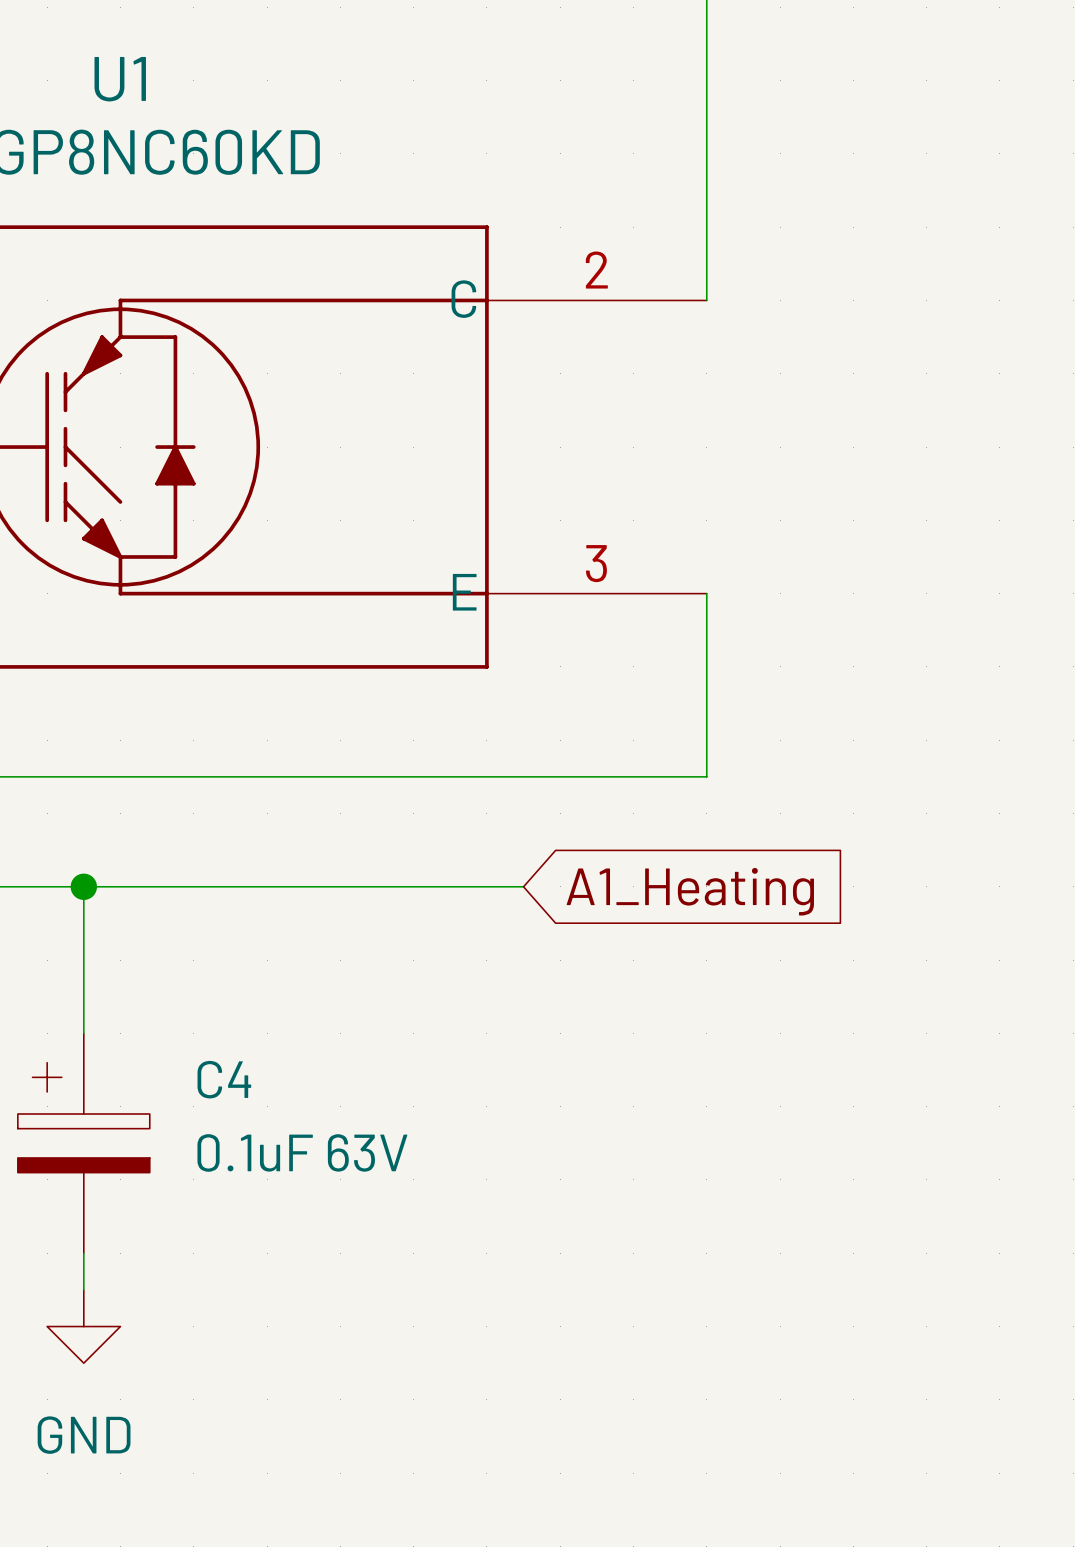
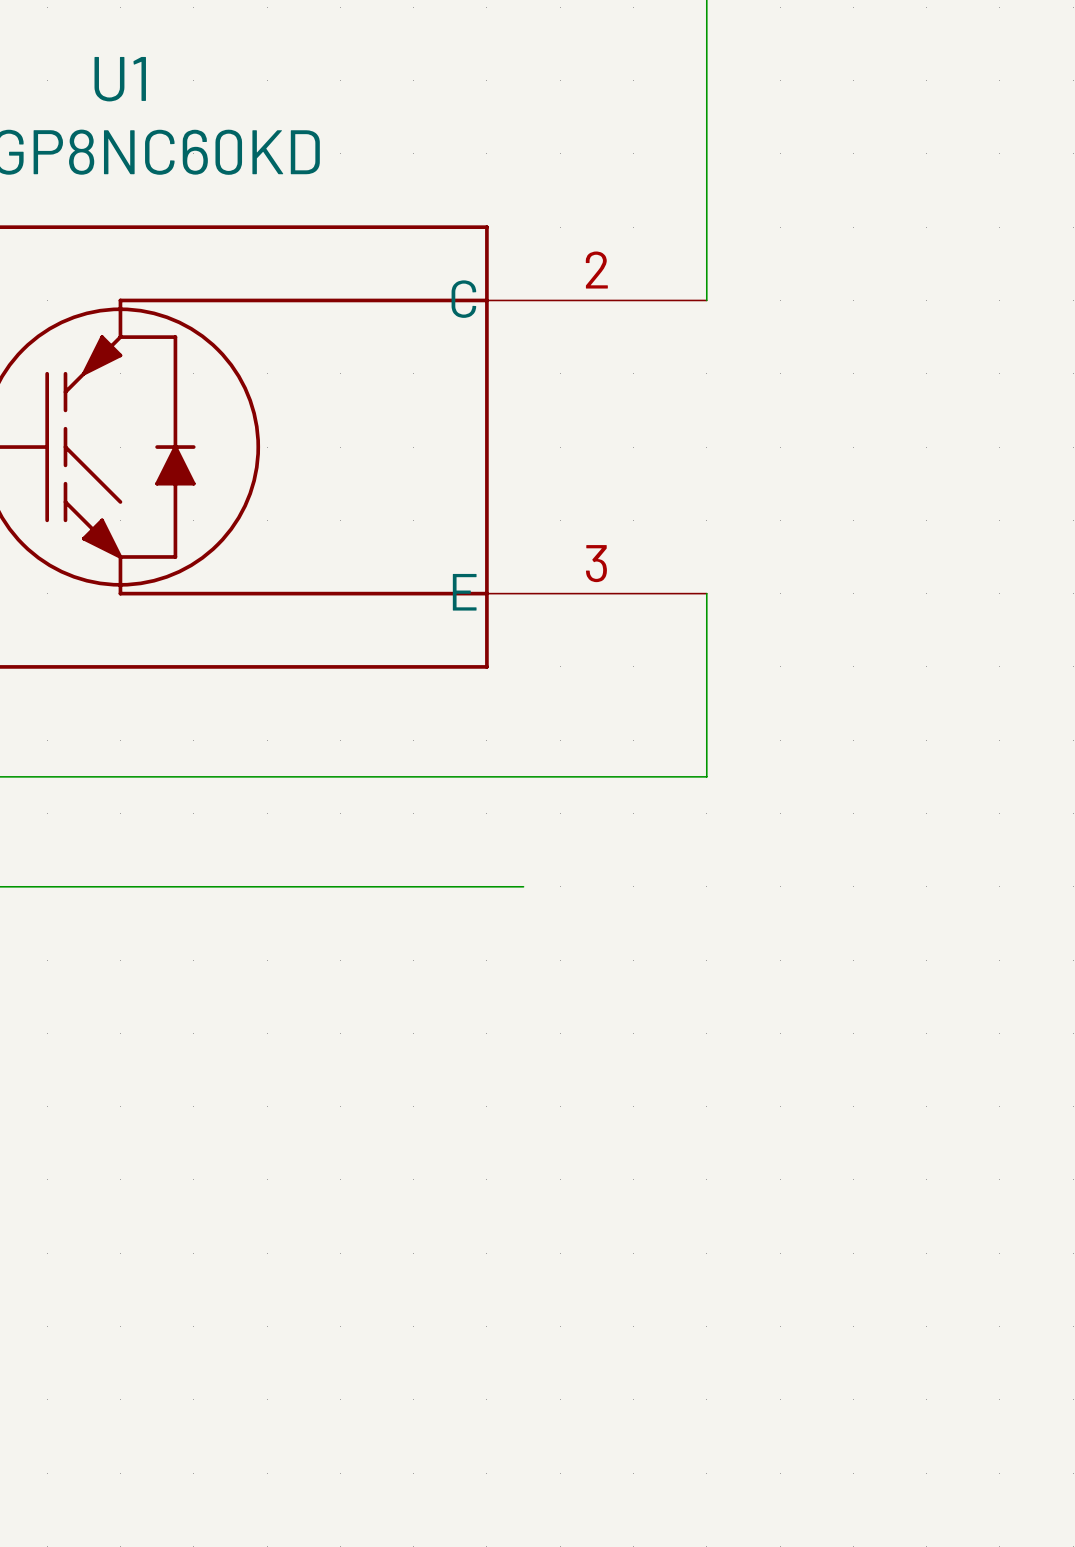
wire: (83, 886) (83, 1033) -> none
junction: (83, 886) -> none
global label: A1_Heating (690, 891) -> none
C4: 0.1uF 63V (83, 1143) -> none
wire: (83, 1253) (83, 1289) -> none
power symbol: GND (83, 1326) -> none

